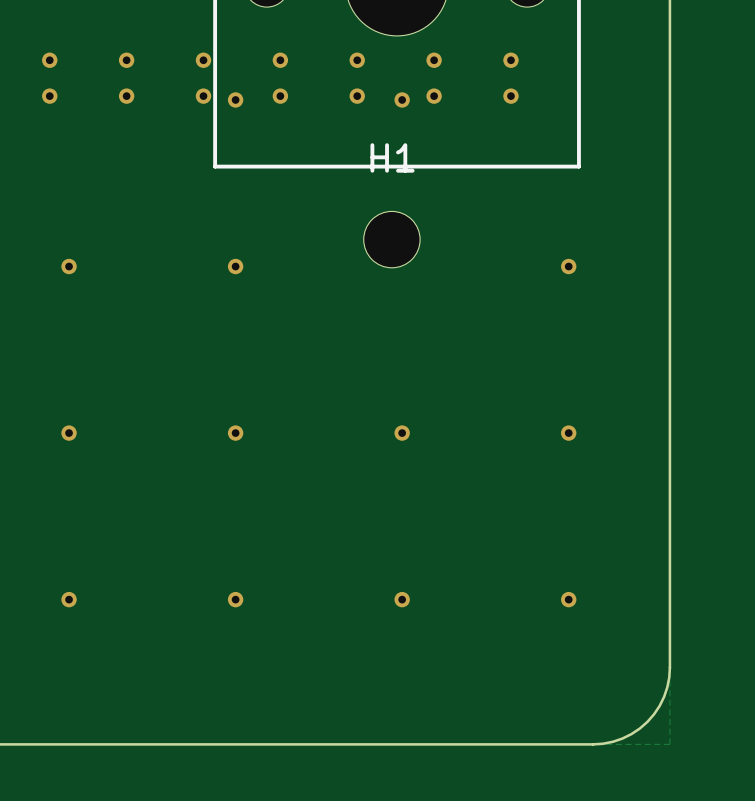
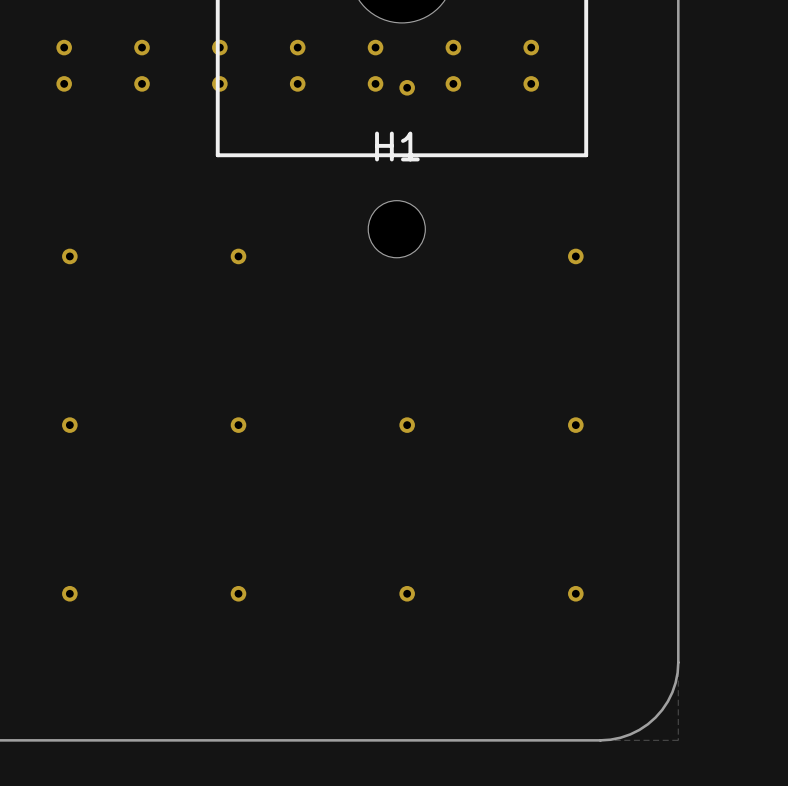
via position: (49, 60) -> (64, 47)
via position: (126, 60) -> (142, 47)
via position: (203, 60) -> (219, 47)
via position: (280, 60) -> (297, 47)
via position: (357, 60) -> (375, 47)
via position: (434, 60) -> (453, 47)
via position: (510, 60) -> (531, 47)
via position: (49, 96) -> (64, 83)
via position: (126, 96) -> (142, 83)
via position: (203, 96) -> (219, 83)
via position: (280, 96) -> (297, 83)
via position: (357, 96) -> (375, 83)
via position: (434, 96) -> (453, 83)
via position: (510, 96) -> (531, 83)
via: (235, 99) -> none

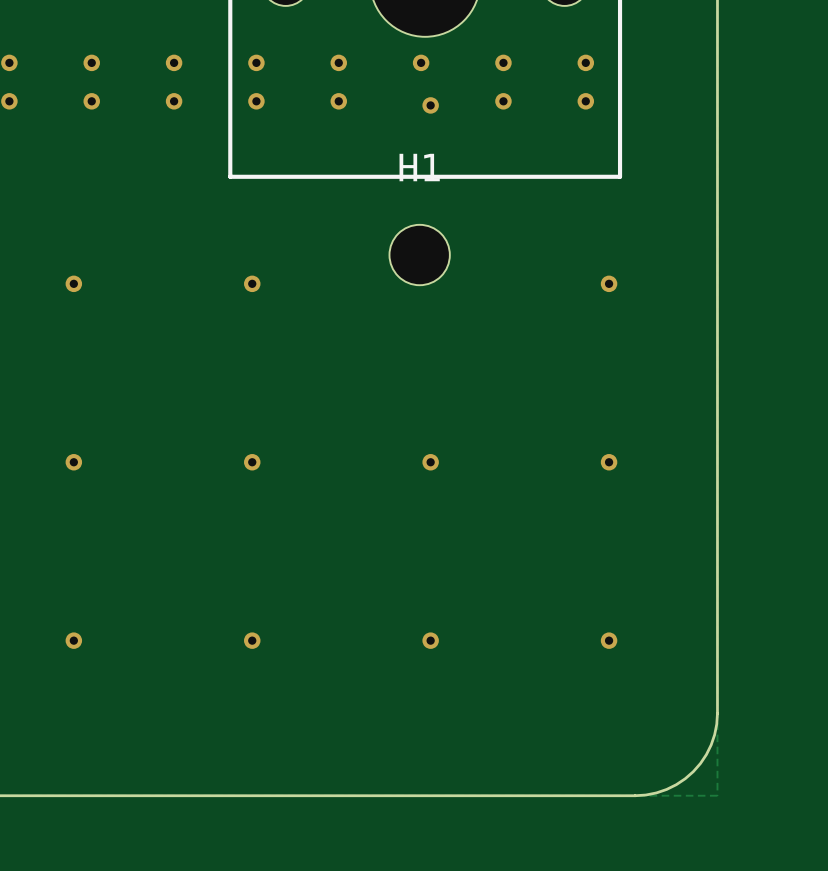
via: none -> (9, 62)
via: (64, 47) -> none
via: none -> (91, 62)
via: (142, 47) -> none
via: none -> (174, 62)
via: (219, 47) -> none
via: none -> (256, 62)
via: (297, 47) -> none
via: none -> (338, 62)
via: (375, 47) -> none
via: none -> (421, 62)
via: (453, 47) -> none
via: none -> (503, 62)
via: (531, 47) -> none
via: none -> (585, 62)
via: none -> (9, 101)
via: (64, 83) -> none
via: none -> (91, 101)
via: (142, 83) -> none
via: none -> (174, 101)
via: (219, 83) -> none
via: none -> (256, 101)
via: (297, 83) -> none
via: none -> (338, 101)
via: (375, 83) -> none
via: (453, 83) -> none
via: none -> (503, 101)
via: (531, 83) -> none
via: none -> (585, 101)

